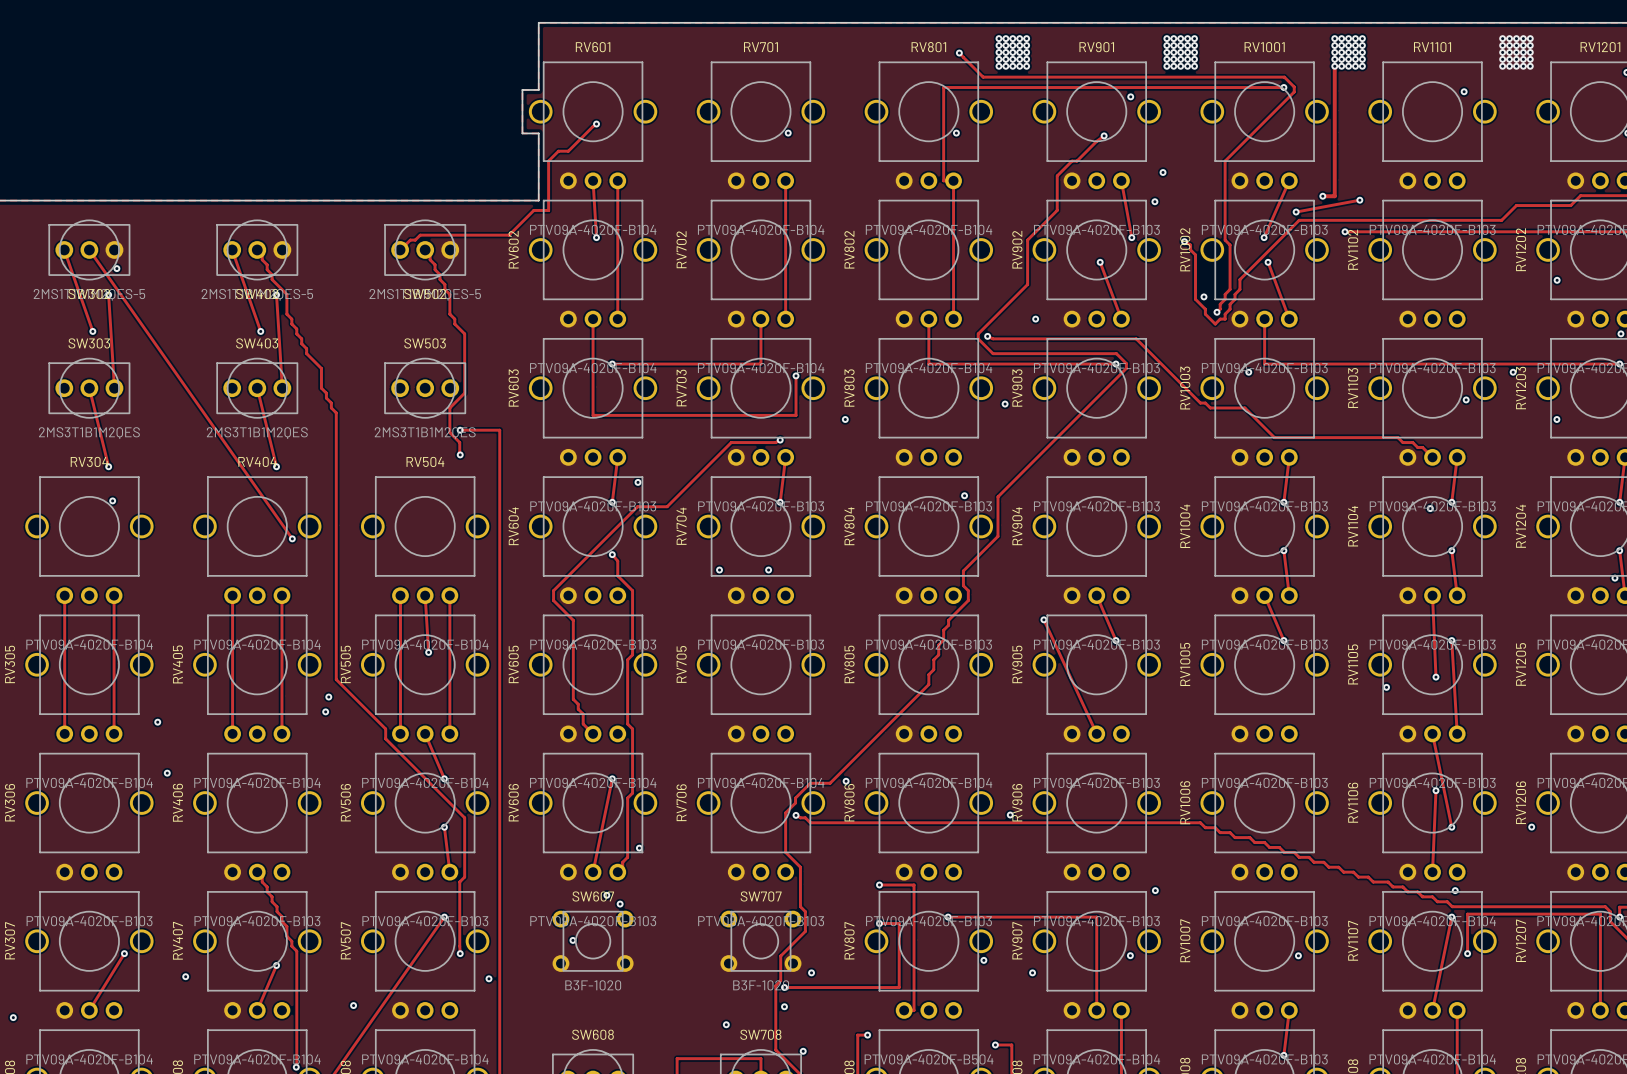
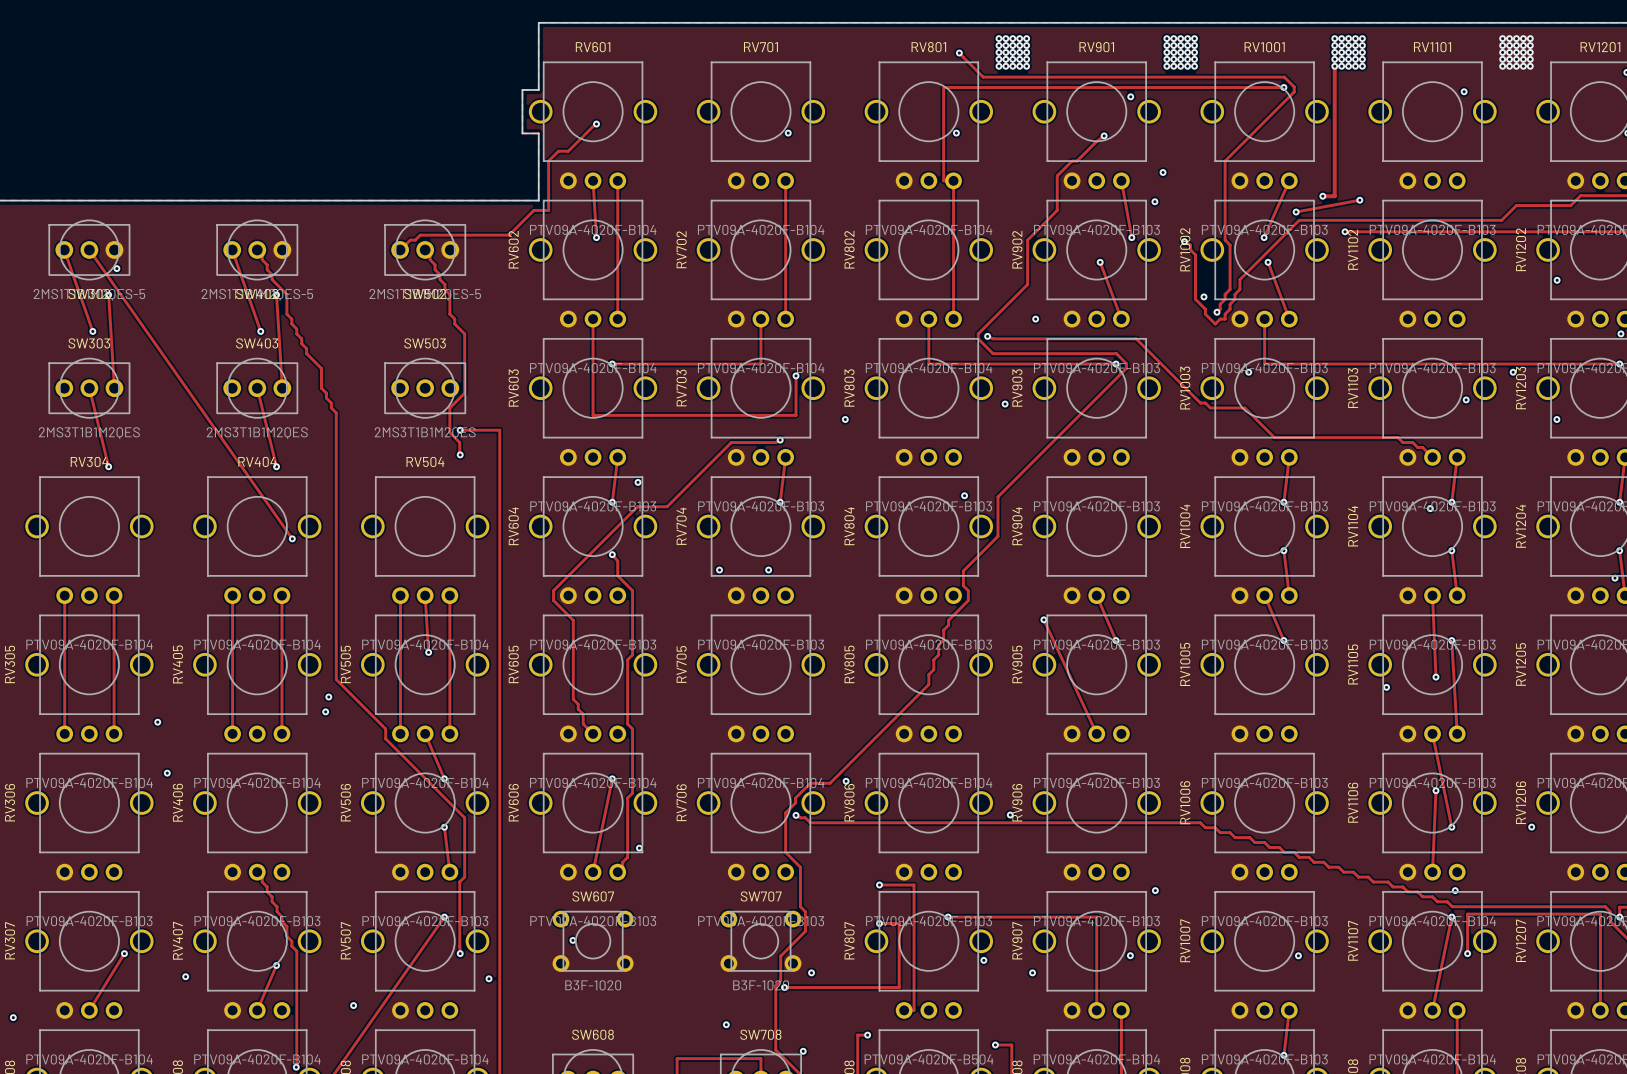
via: (112, 500) -> none
via: (606, 895) -> none
via: (620, 904) -> none
via: (784, 1006) -> none

